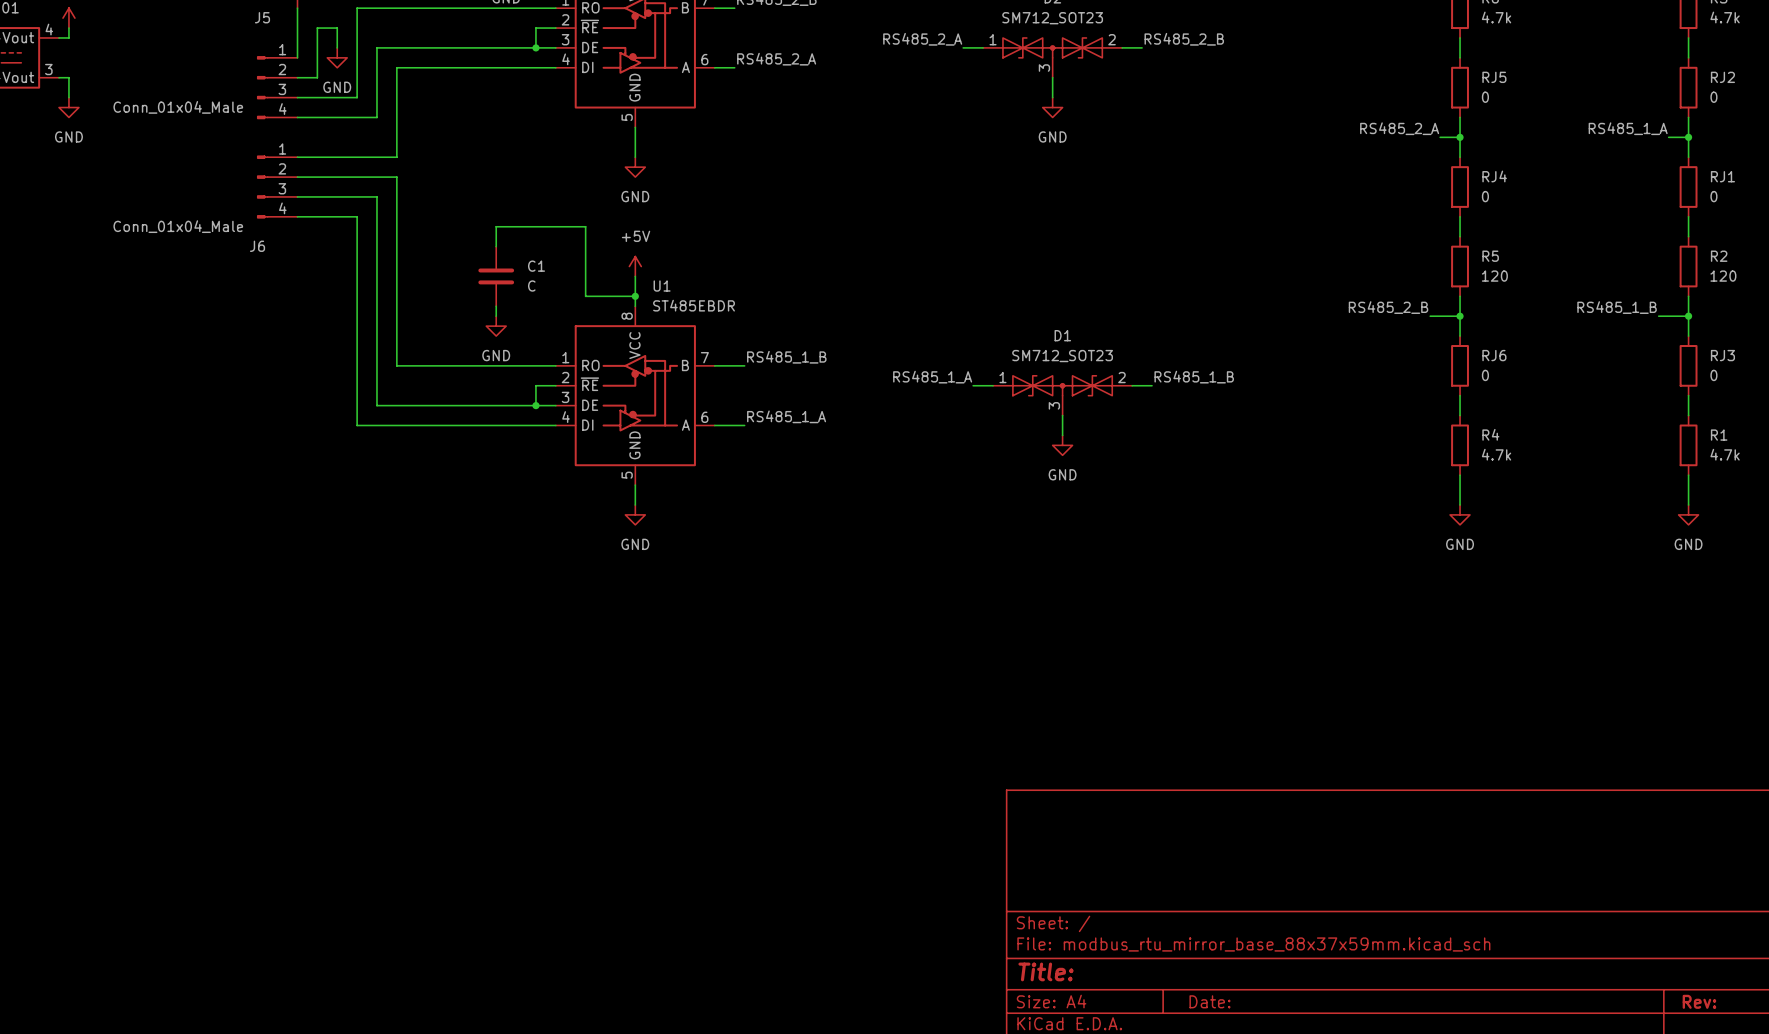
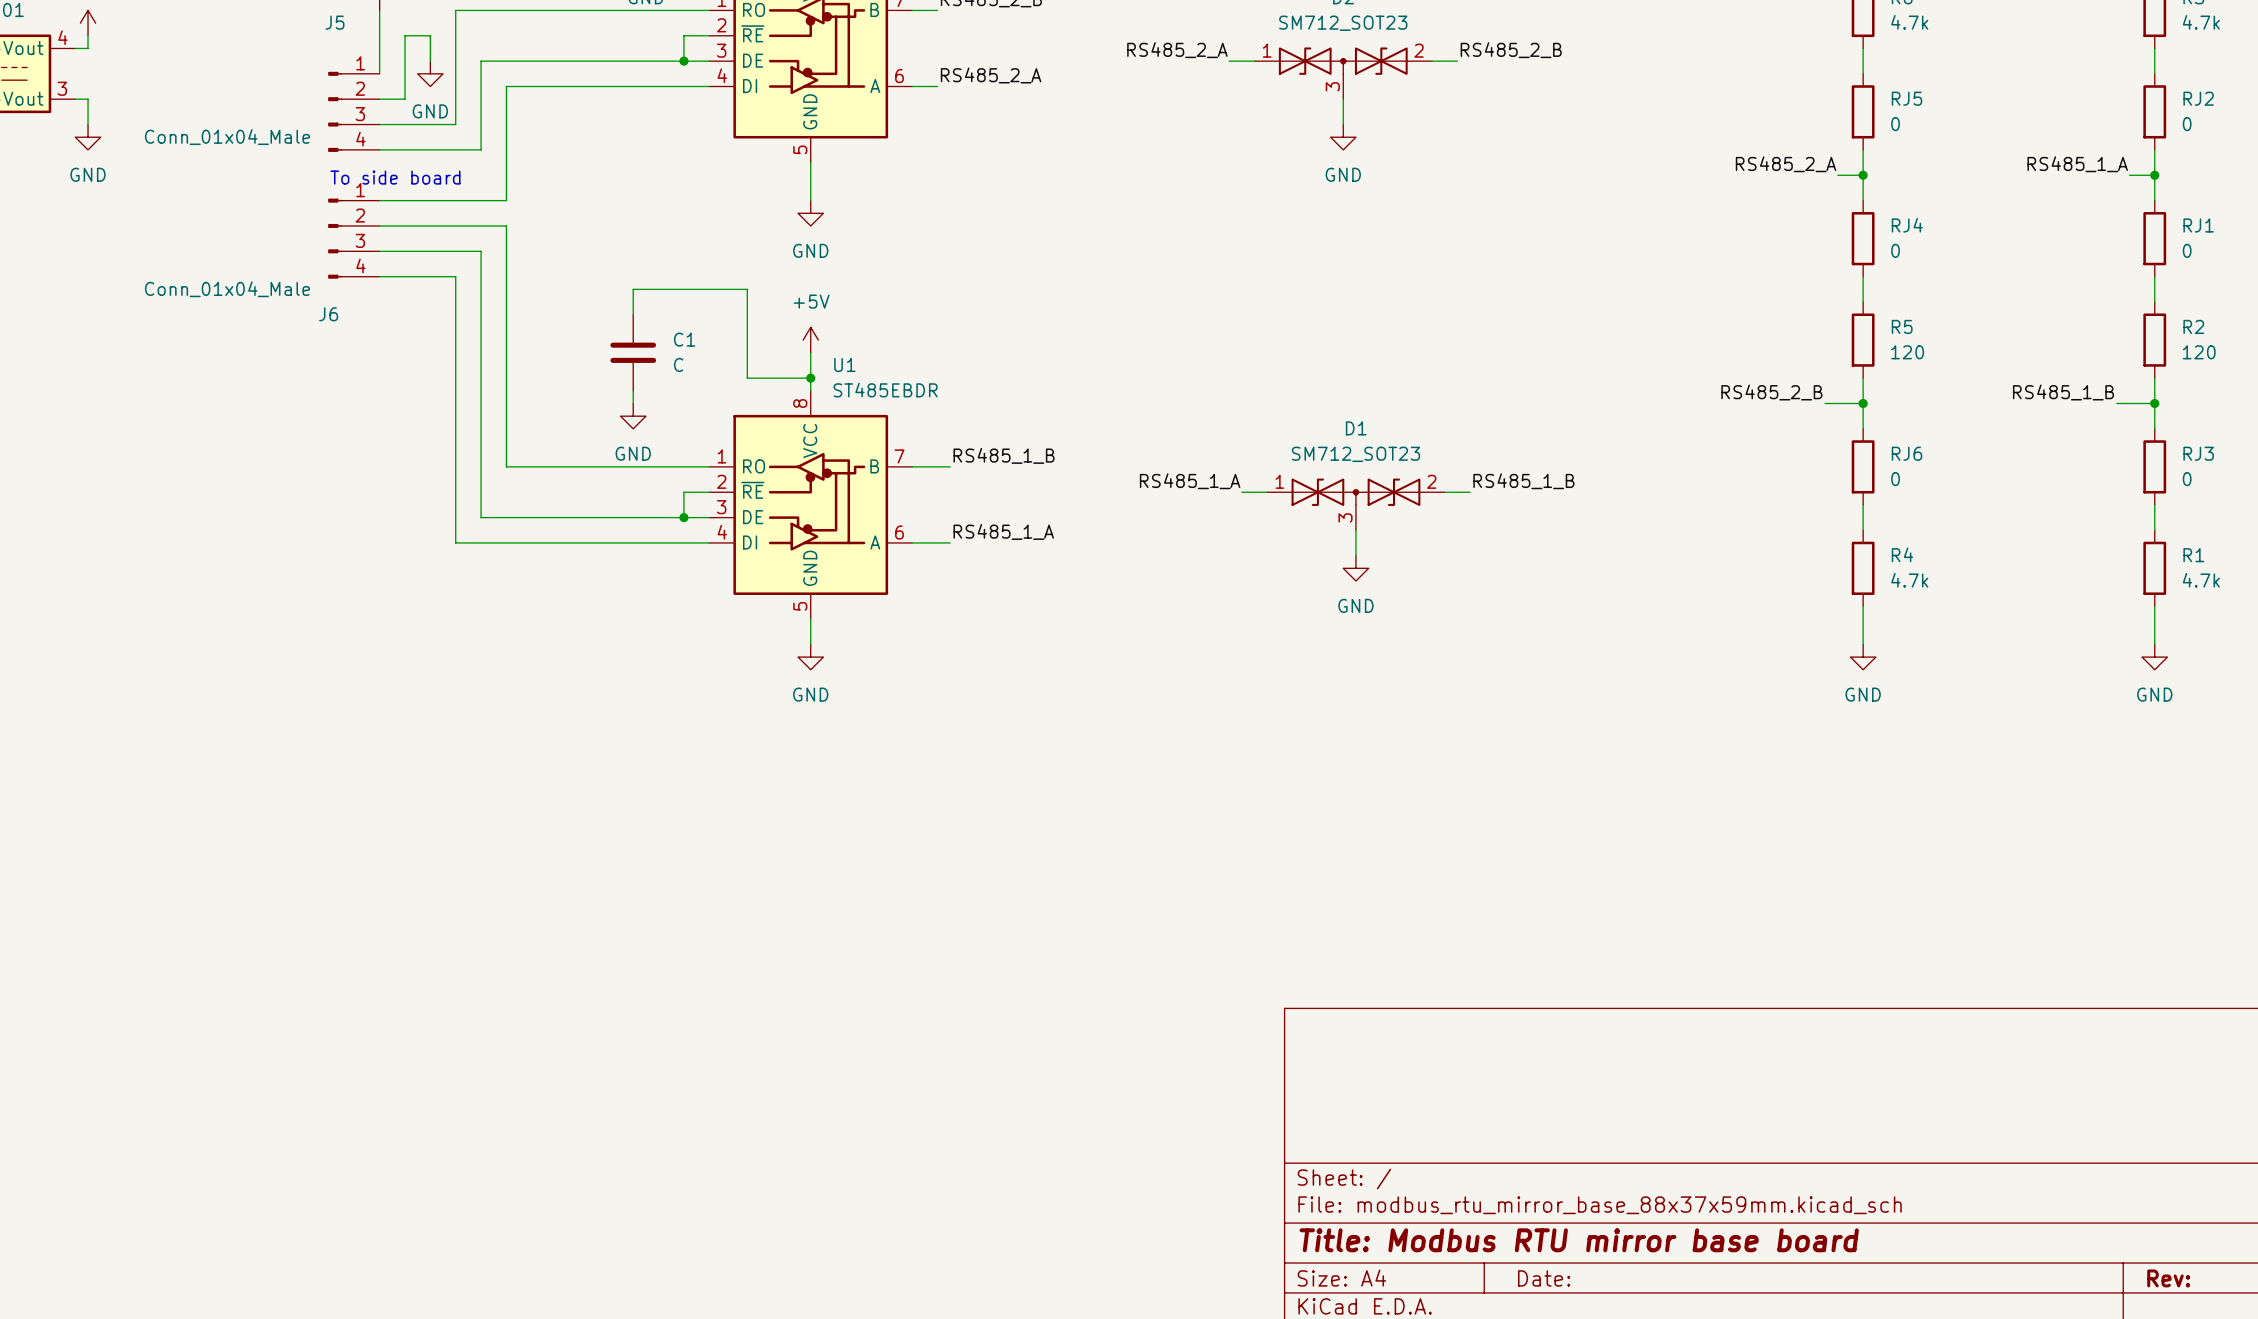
text: none -> To side board (395, 177)
title block: Title: (1046, 971) -> Title: Modbus RTU mirror base board (1579, 1240)

